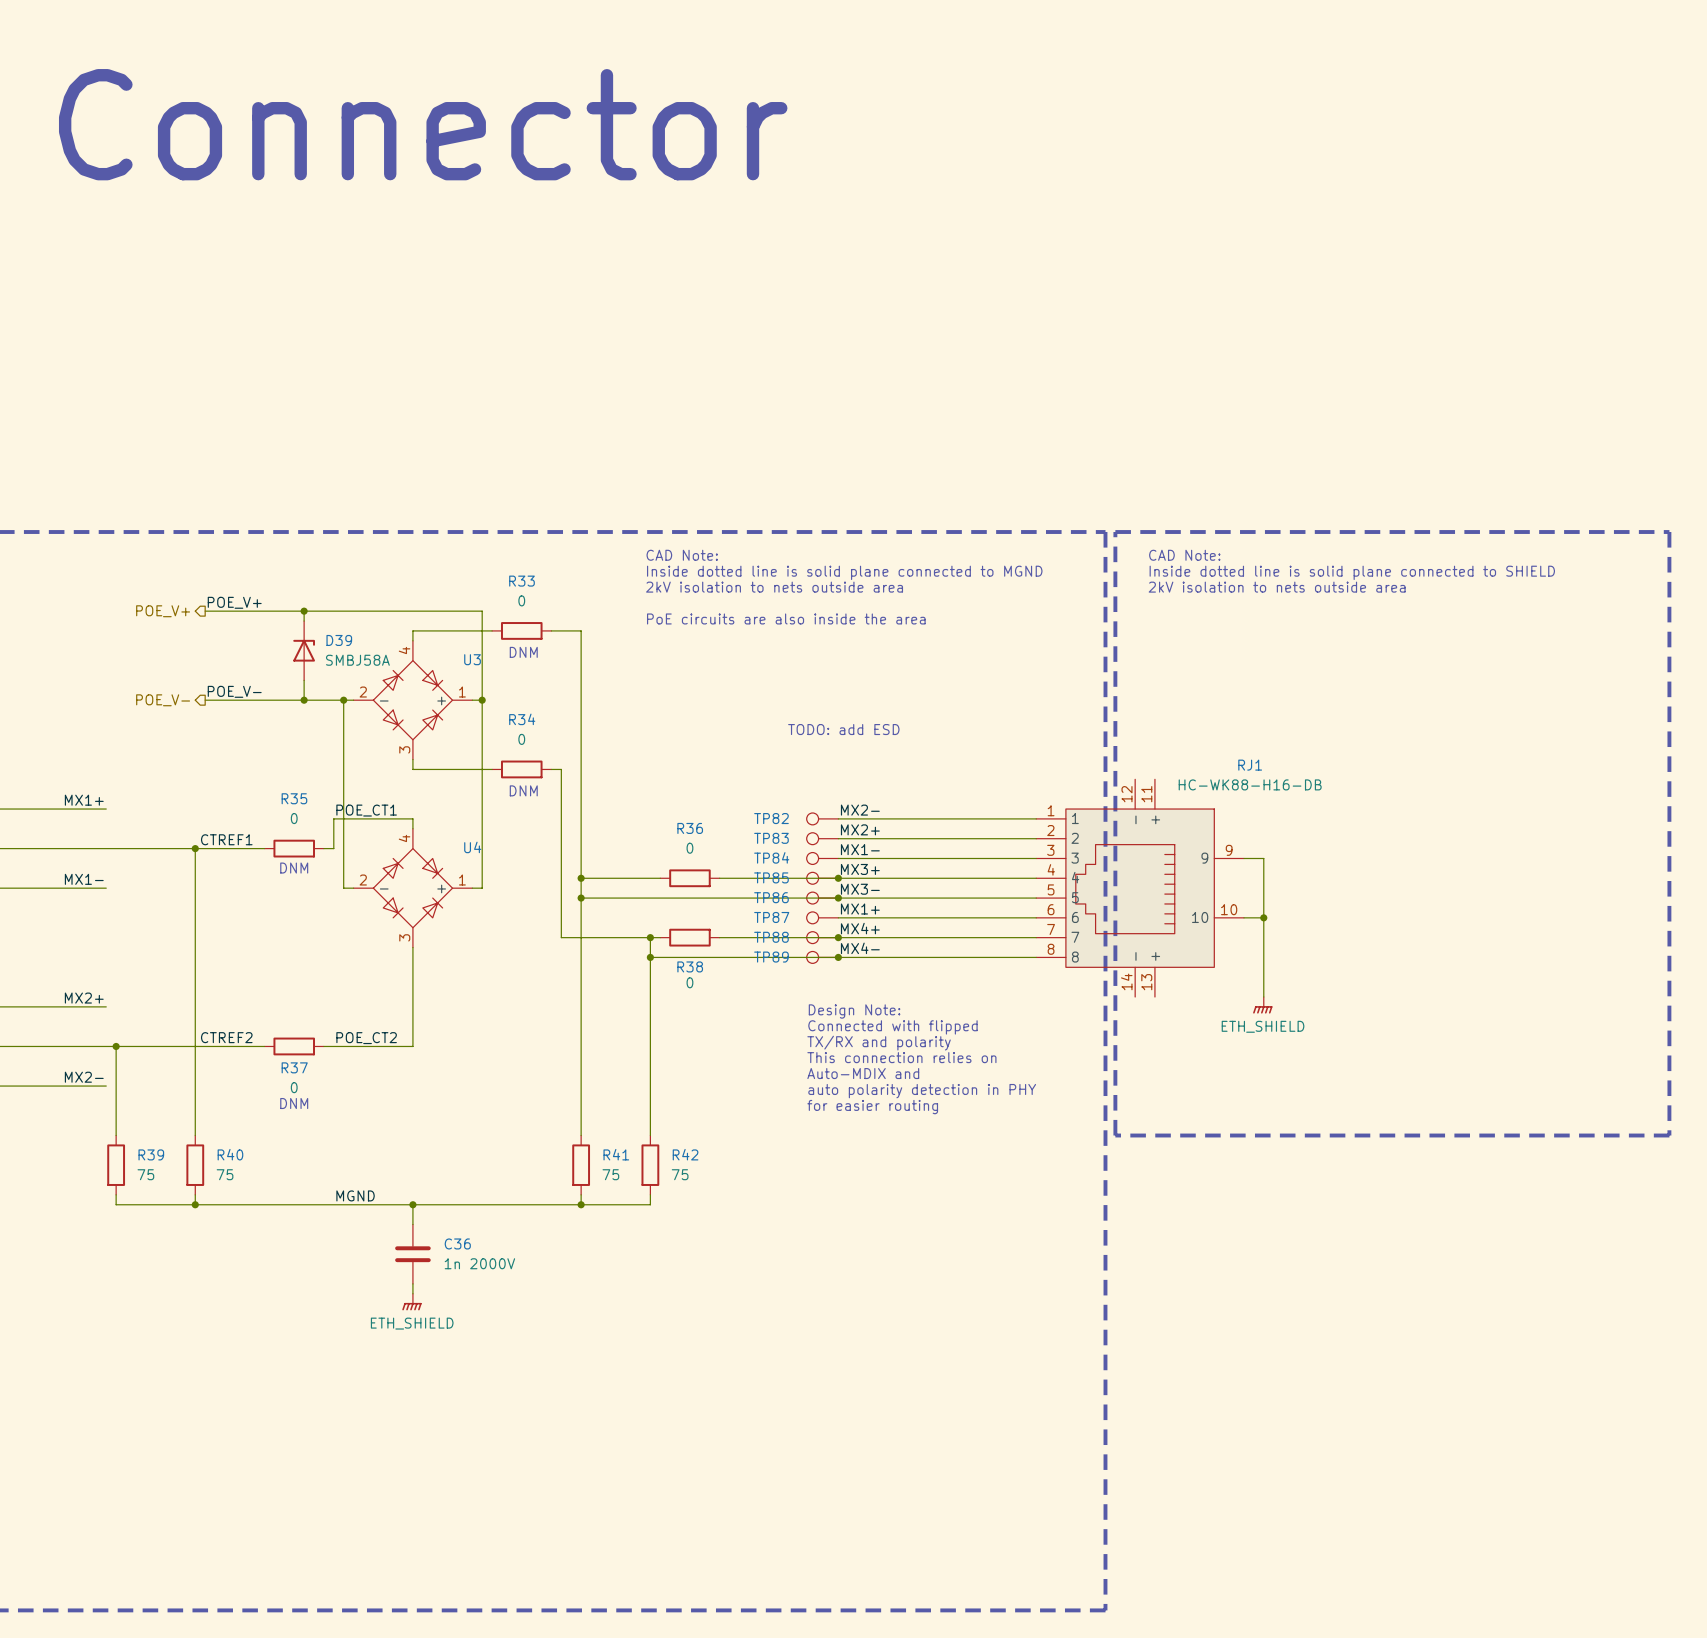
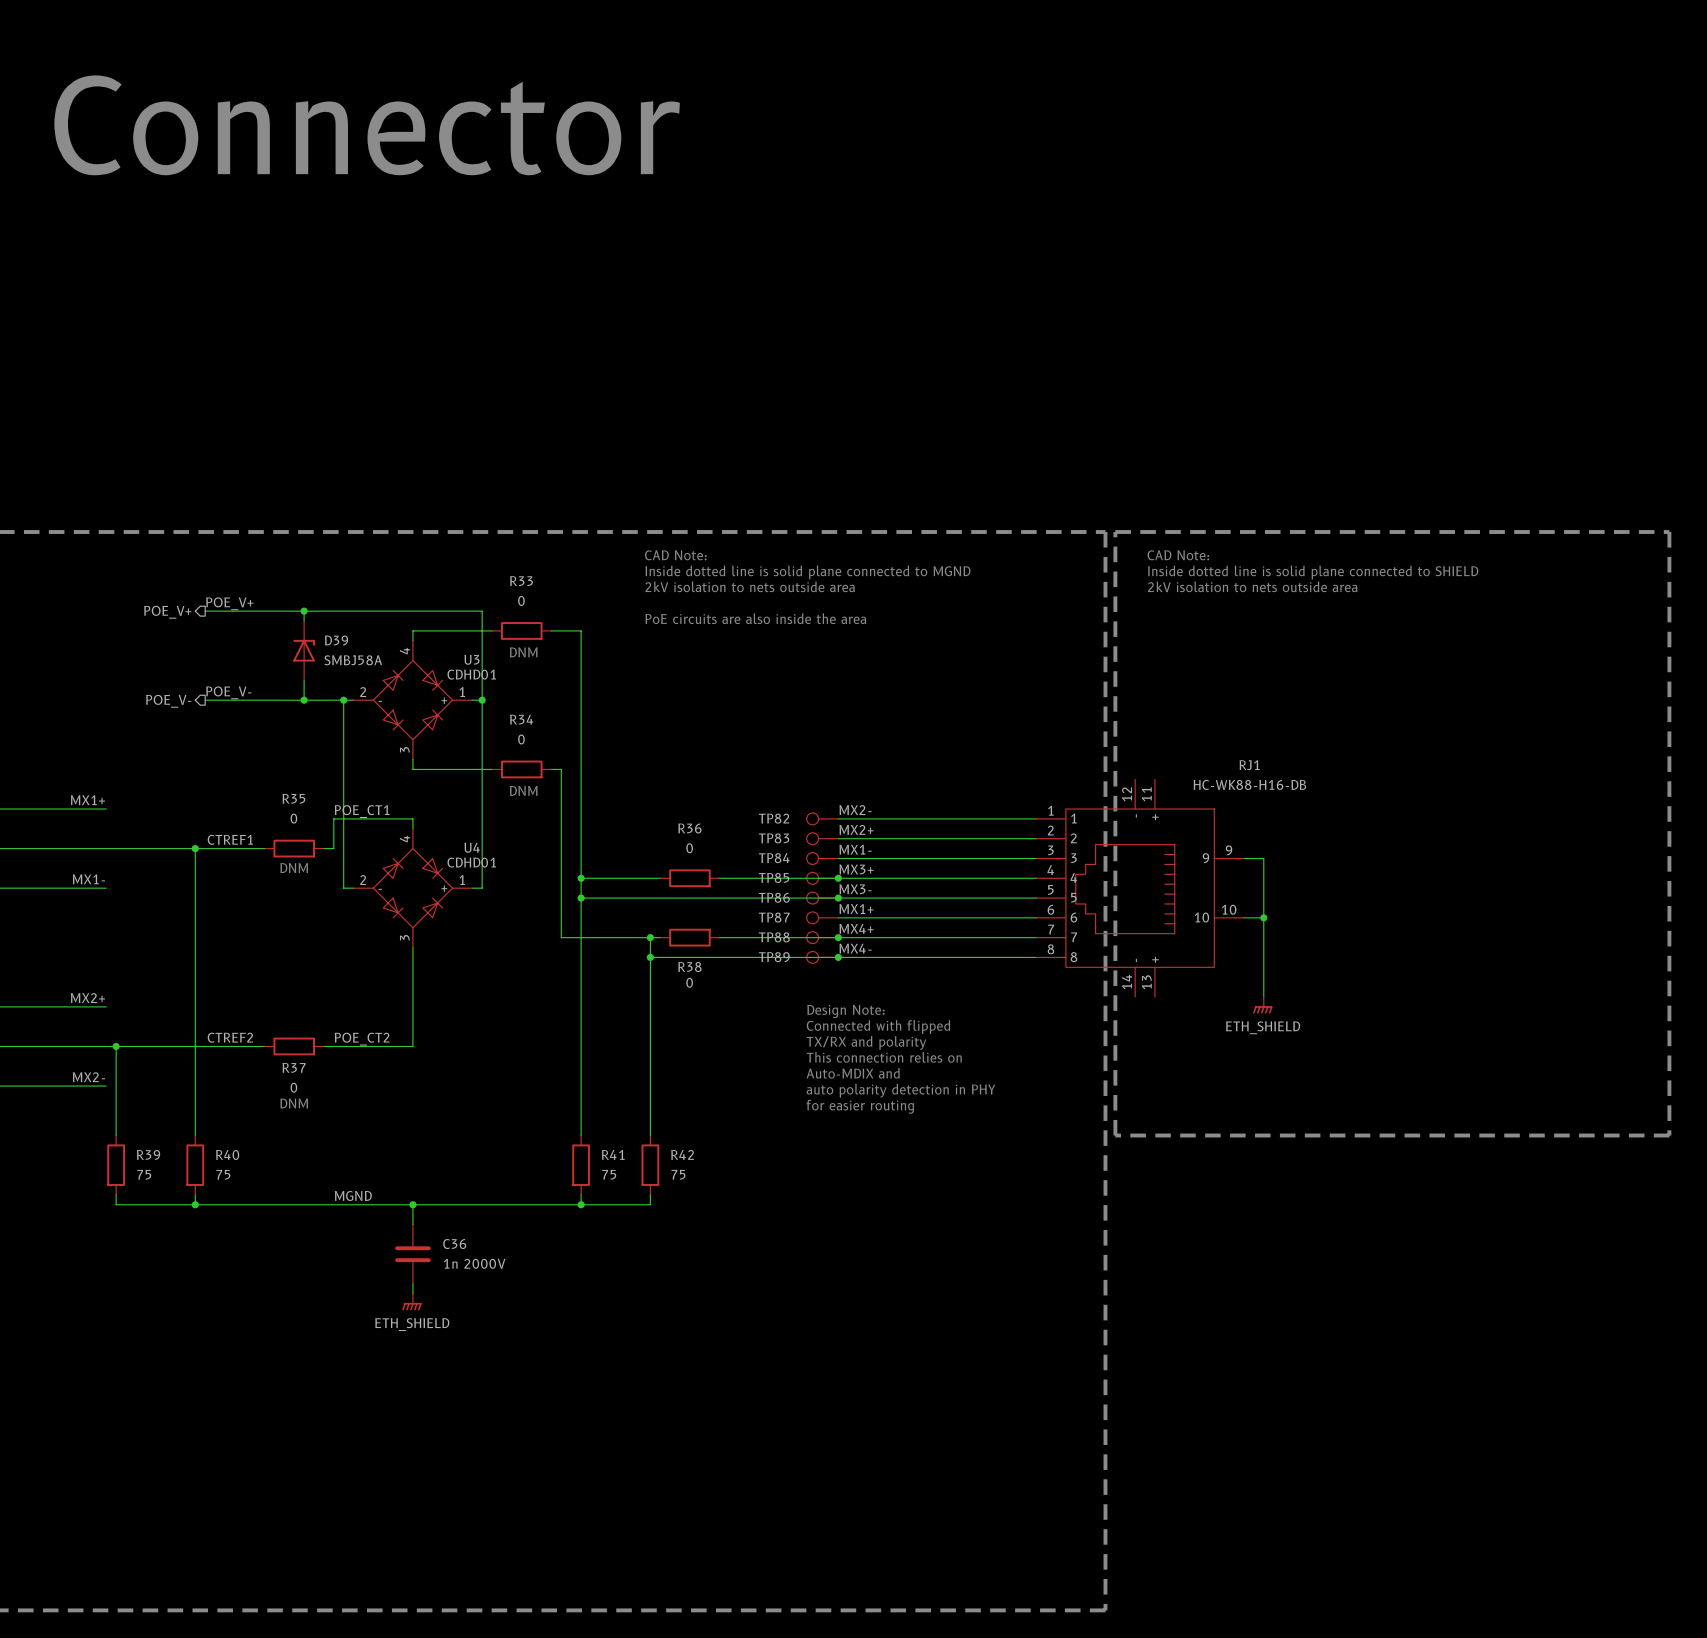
U3 value: none -> CDHD01 (471, 674)
text: TODO: add ESD (843, 729) -> none
U4 value: none -> CDHD01 (471, 862)

